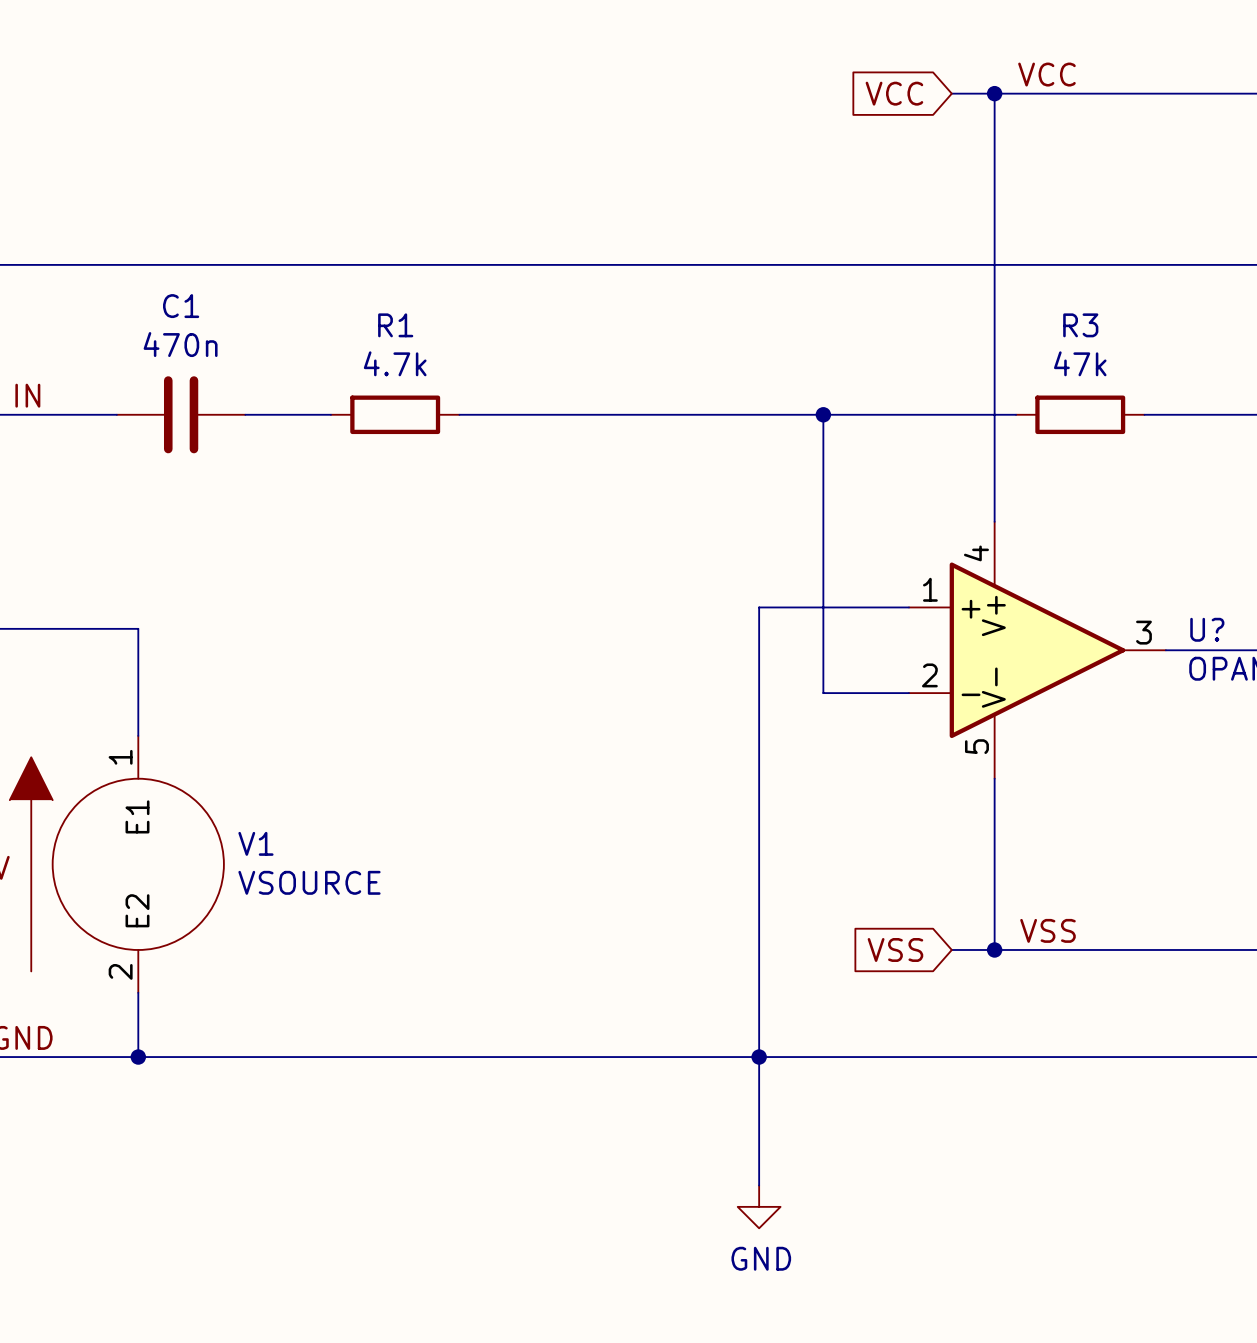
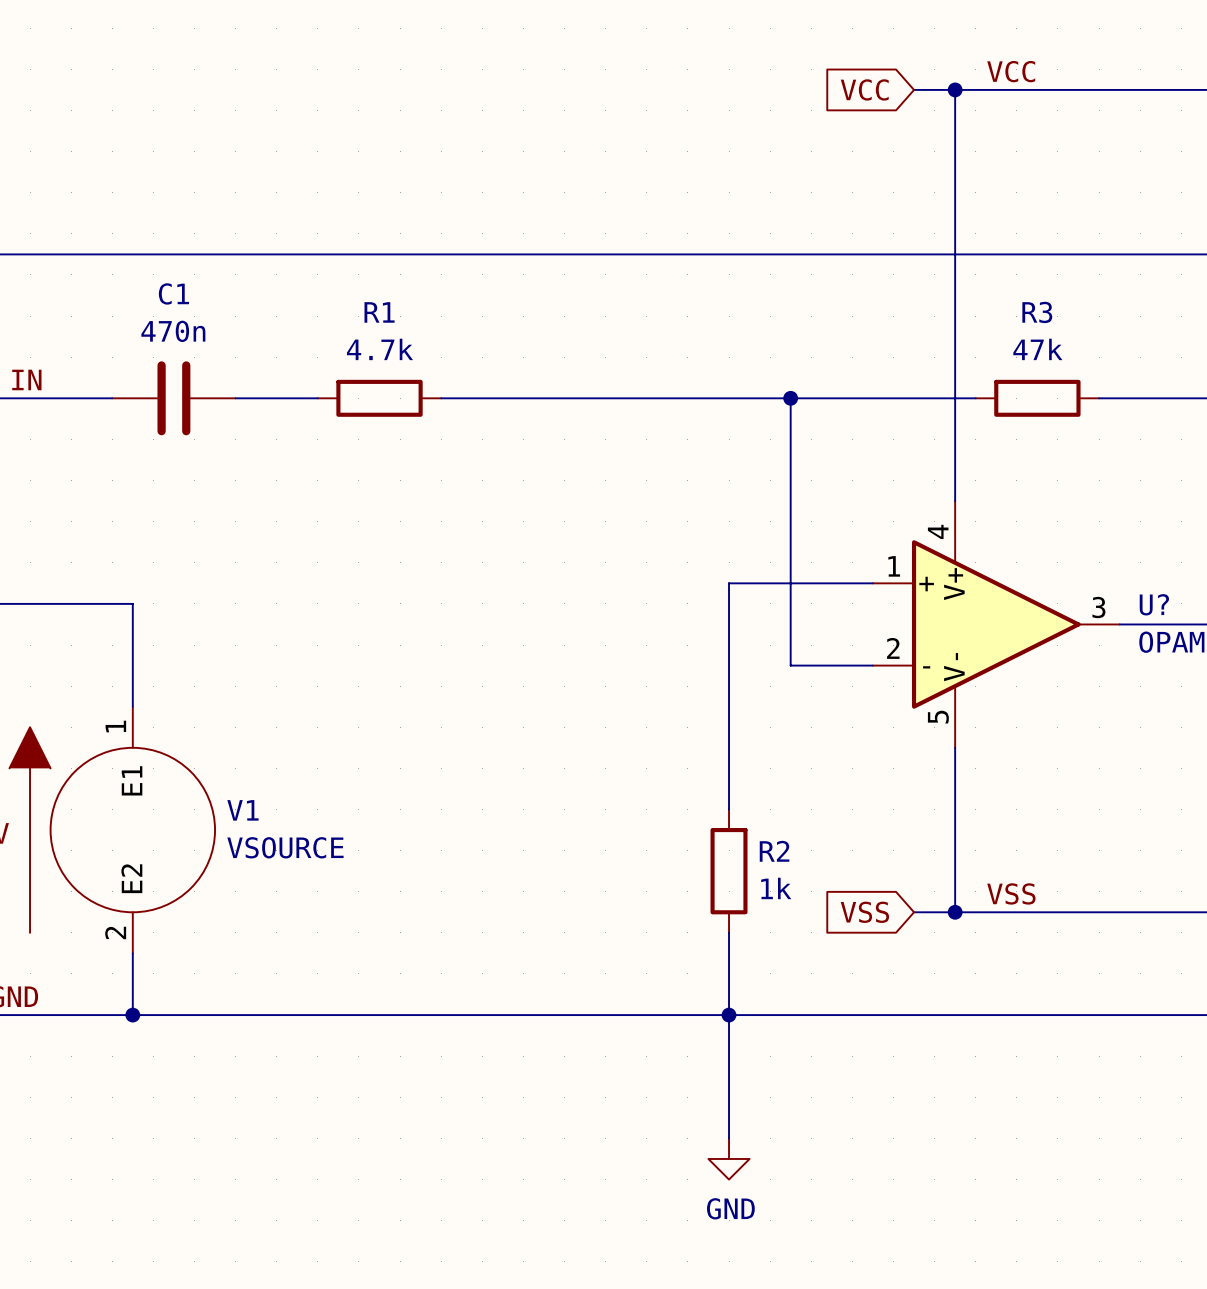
wire: (759, 842) (759, 971) -> none
R2: none -> 1k (729, 871)

